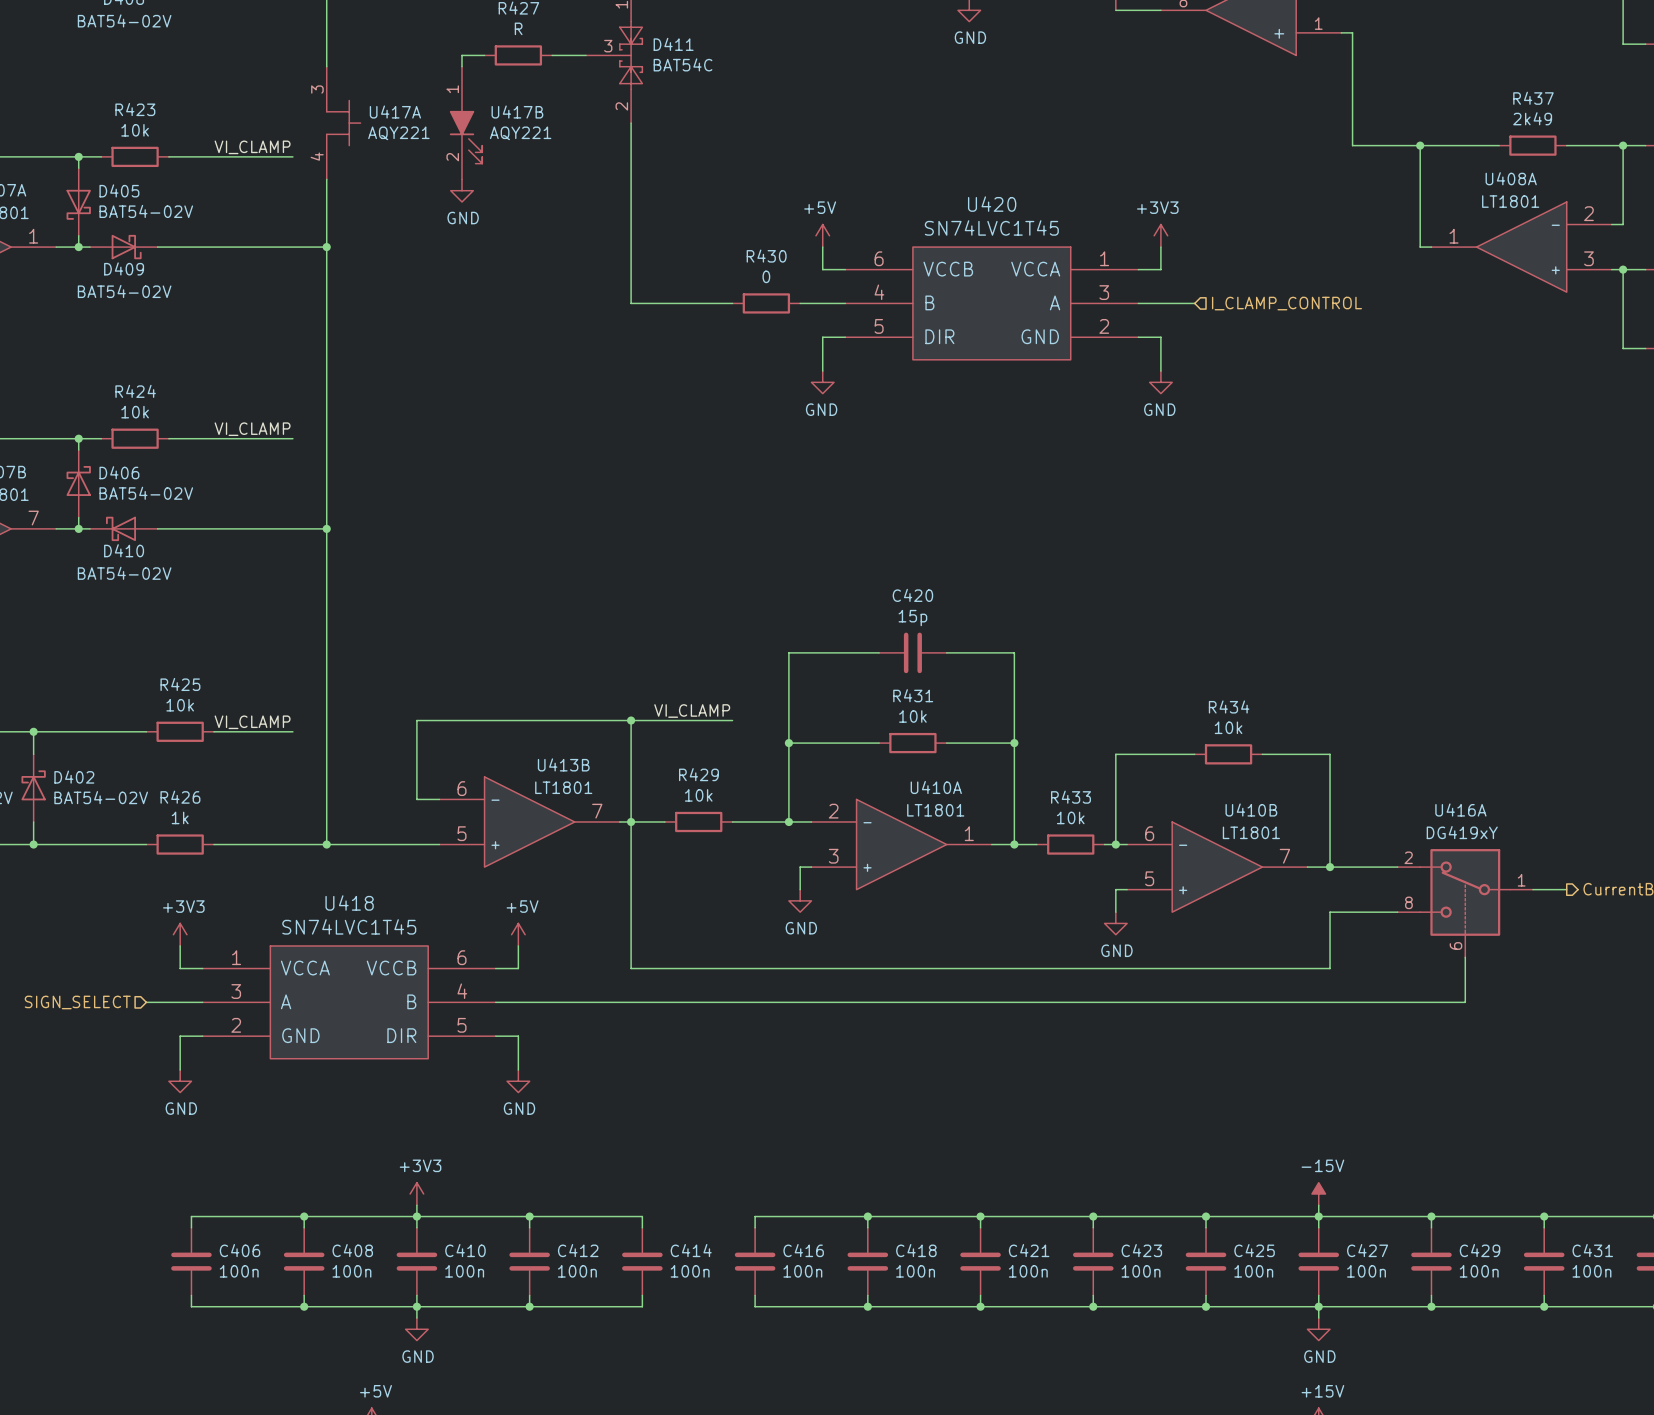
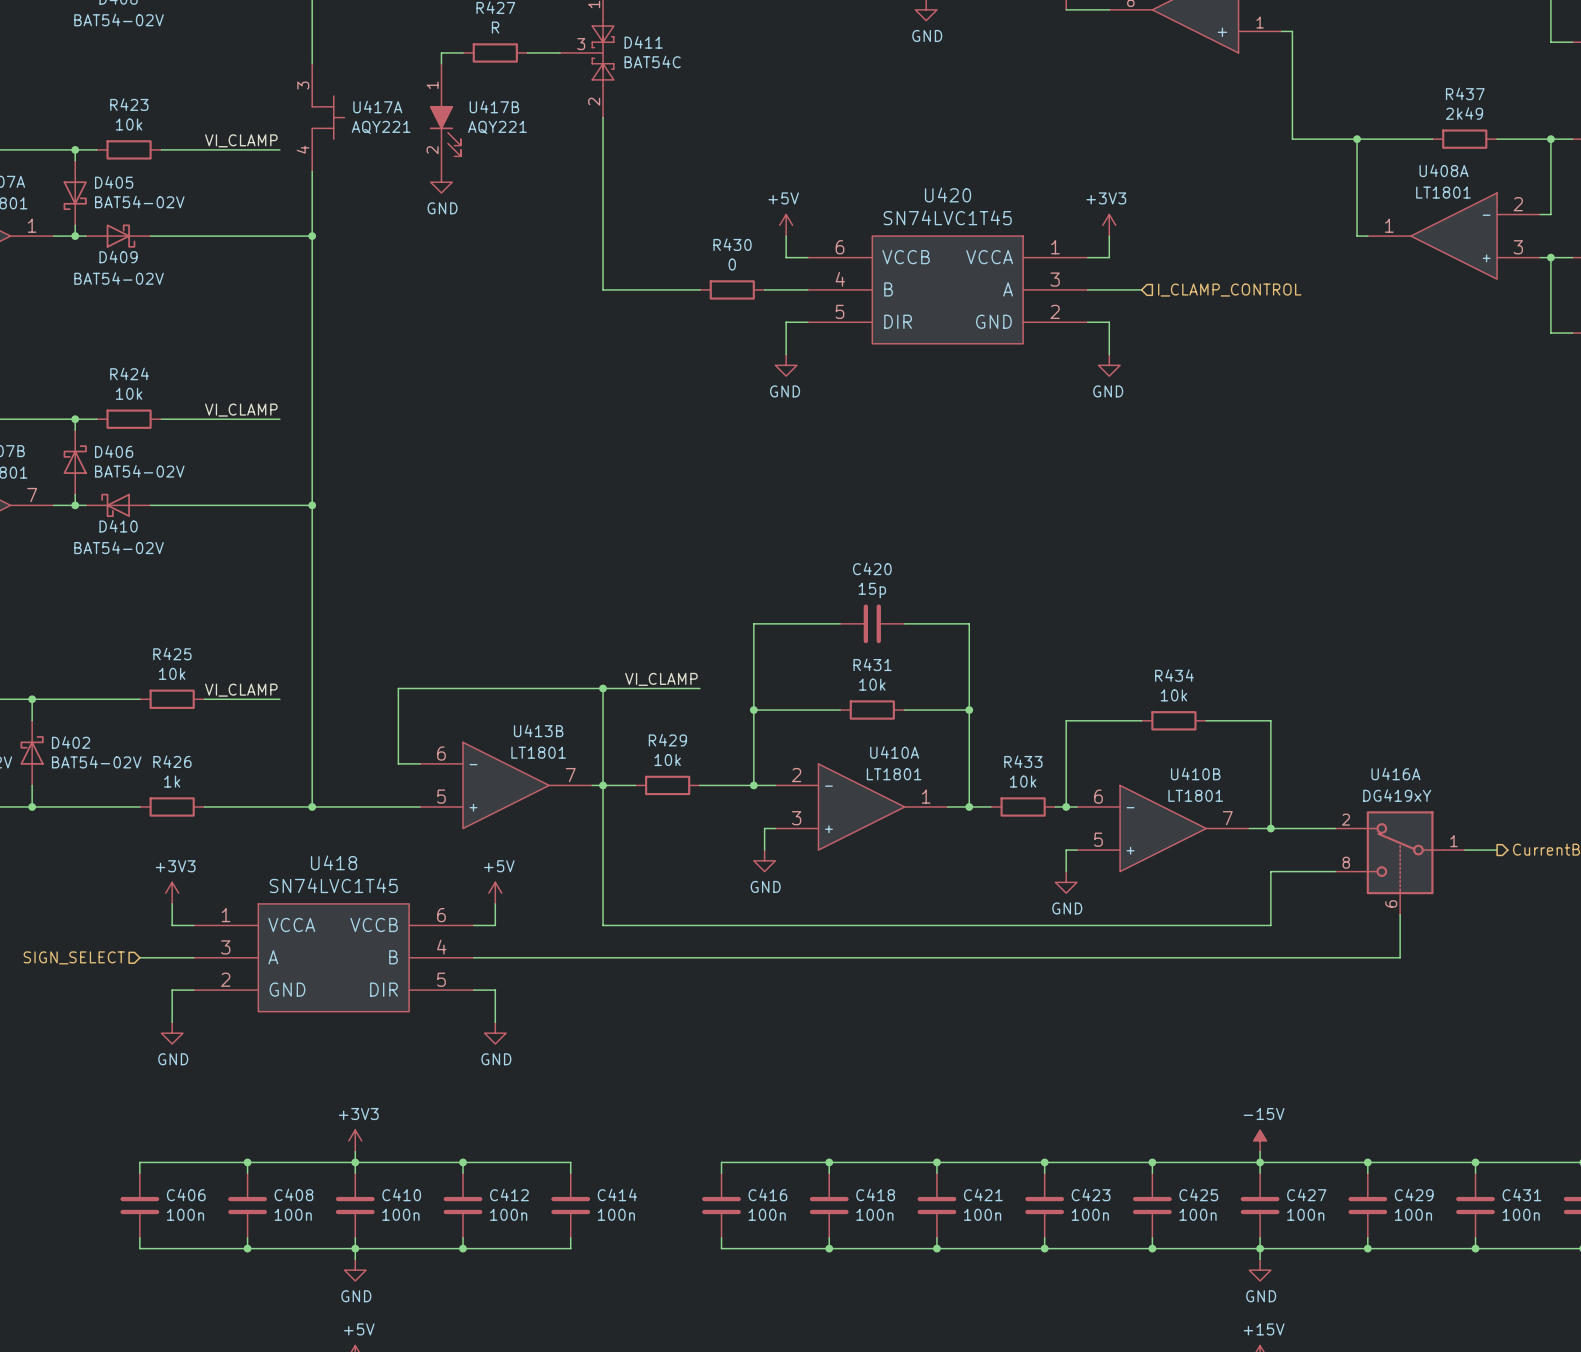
power symbol position: +3V3 (416, 1193) -> +3V3 (355, 1140)
wire: (416, 1205) (416, 1227) -> (355, 1151) (355, 1173)
wire: (191, 1216) (191, 1227) -> (182, 1162) (139, 1162) (139, 1173)
junction: none -> (247, 1162)
wire: (304, 1216) (304, 1227) -> (247, 1162) (247, 1173)
junction: (304, 1216) -> none
junction: none -> (355, 1162)
junction: (416, 1216) -> none
junction: none -> (463, 1162)
wire: (529, 1216) (529, 1227) -> (463, 1162) (463, 1173)
junction: (529, 1216) -> none
wire: (597, 1216) (642, 1216) (642, 1227) -> (570, 1162) (570, 1173)
C406 position: (191, 1261) -> (139, 1205)
C408 position: (304, 1261) -> (247, 1205)
C410 position: (416, 1261) -> (355, 1205)
C412 position: (529, 1261) -> (463, 1205)
C414 position: (642, 1261) -> (570, 1205)
wire: (191, 1295) (191, 1306) -> (139, 1237) (139, 1248) (182, 1248)
wire: (304, 1295) (304, 1306) -> (247, 1237) (247, 1248)
wire: (416, 1295) (416, 1317) -> (355, 1237) (355, 1259)
wire: (529, 1295) (529, 1306) -> (463, 1237) (463, 1248)
wire: (642, 1295) (642, 1306) (597, 1306) -> (570, 1237) (570, 1248)
junction: none -> (247, 1248)
junction: (304, 1306) -> none
junction: none -> (355, 1248)
junction: (416, 1306) -> none
junction: none -> (463, 1248)
junction: (529, 1306) -> none
power symbol position: GND (416, 1329) -> GND (355, 1270)

